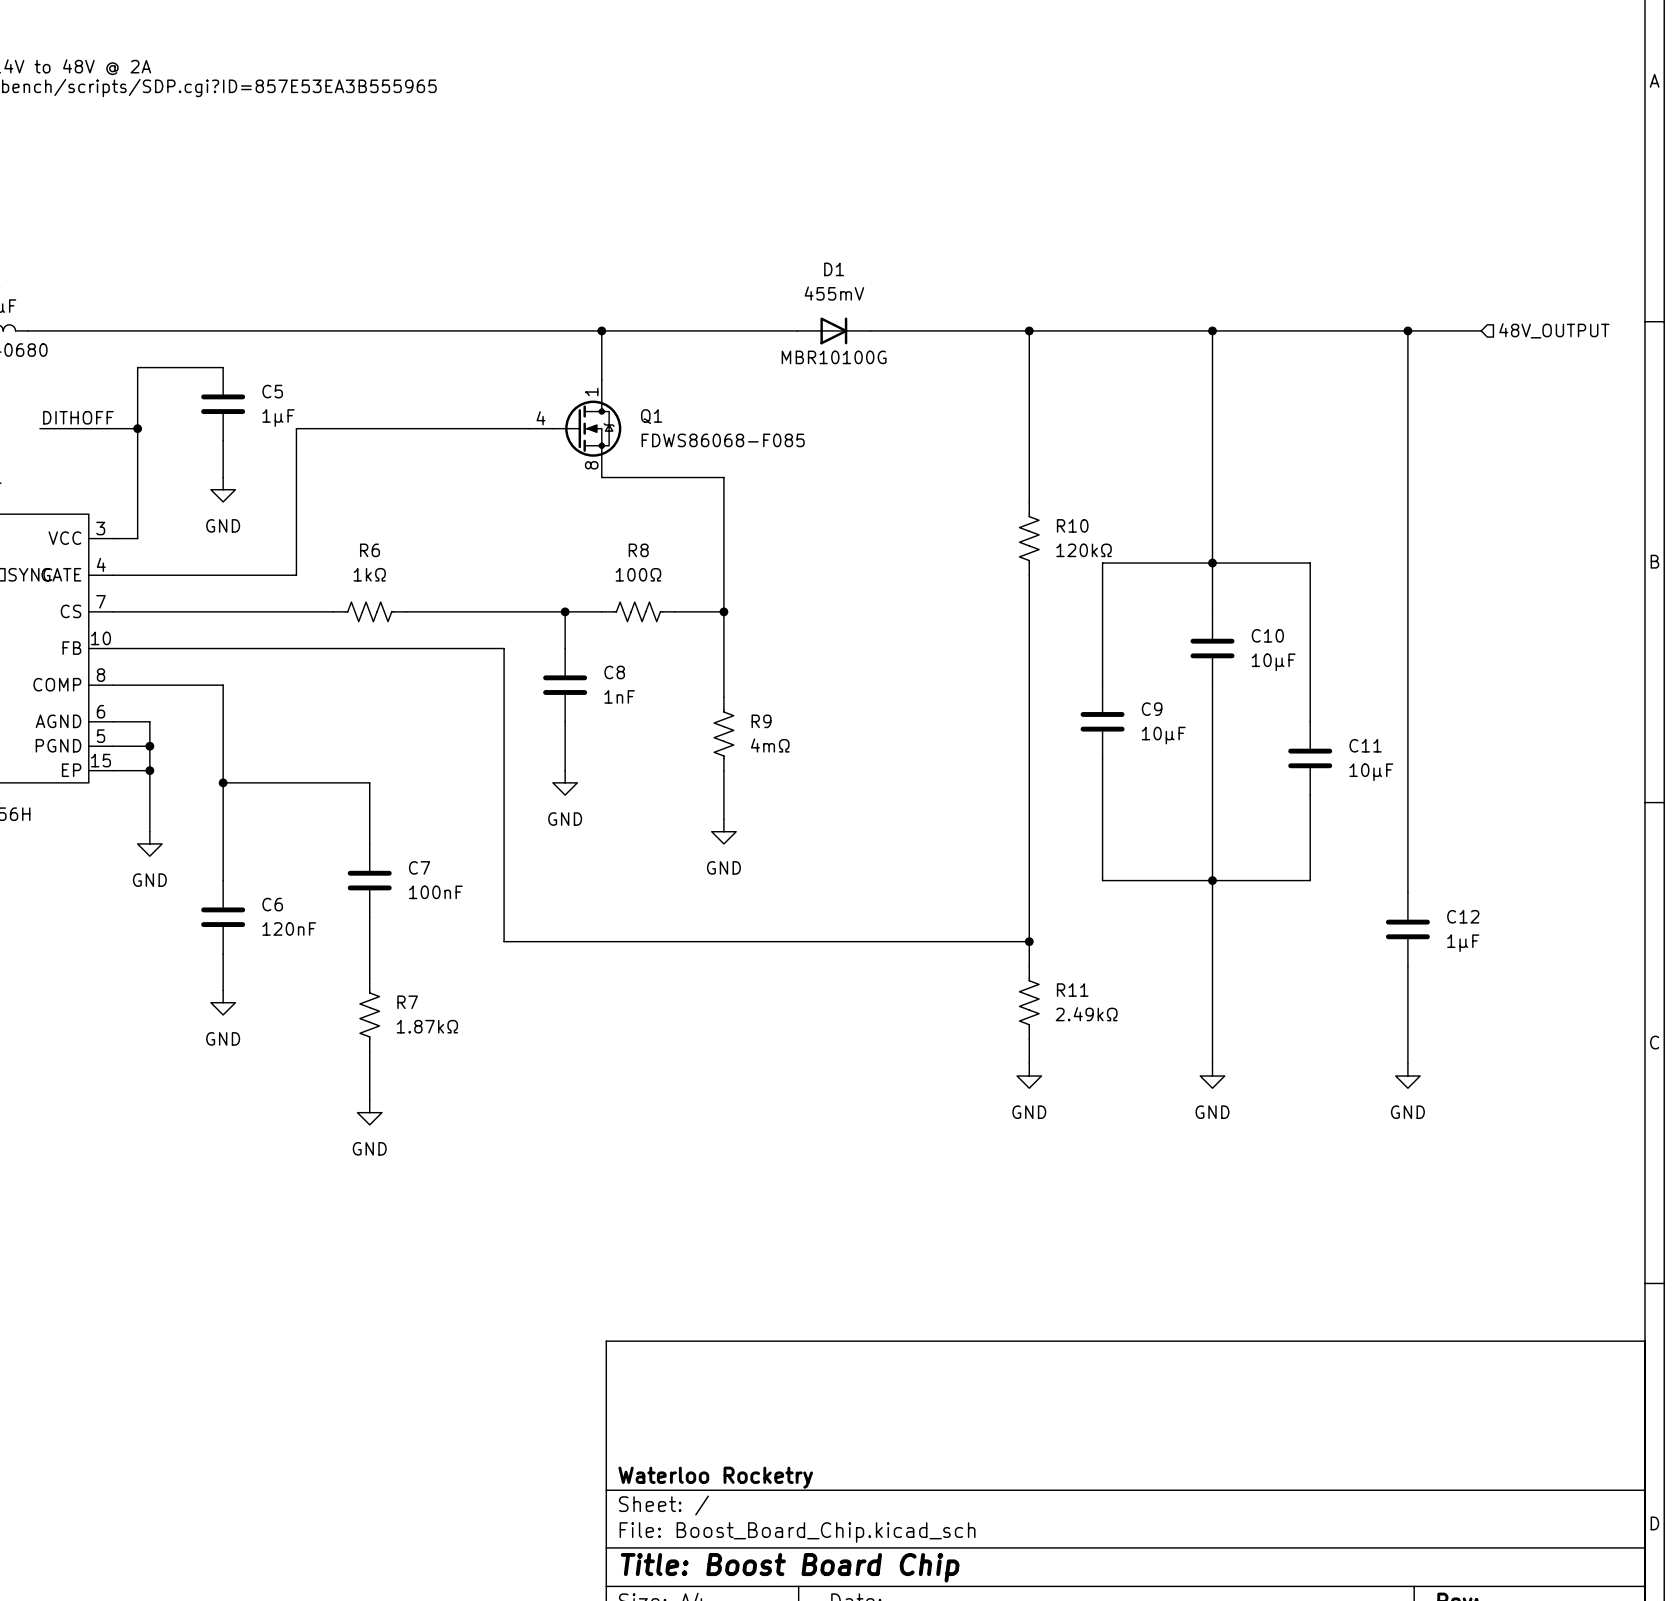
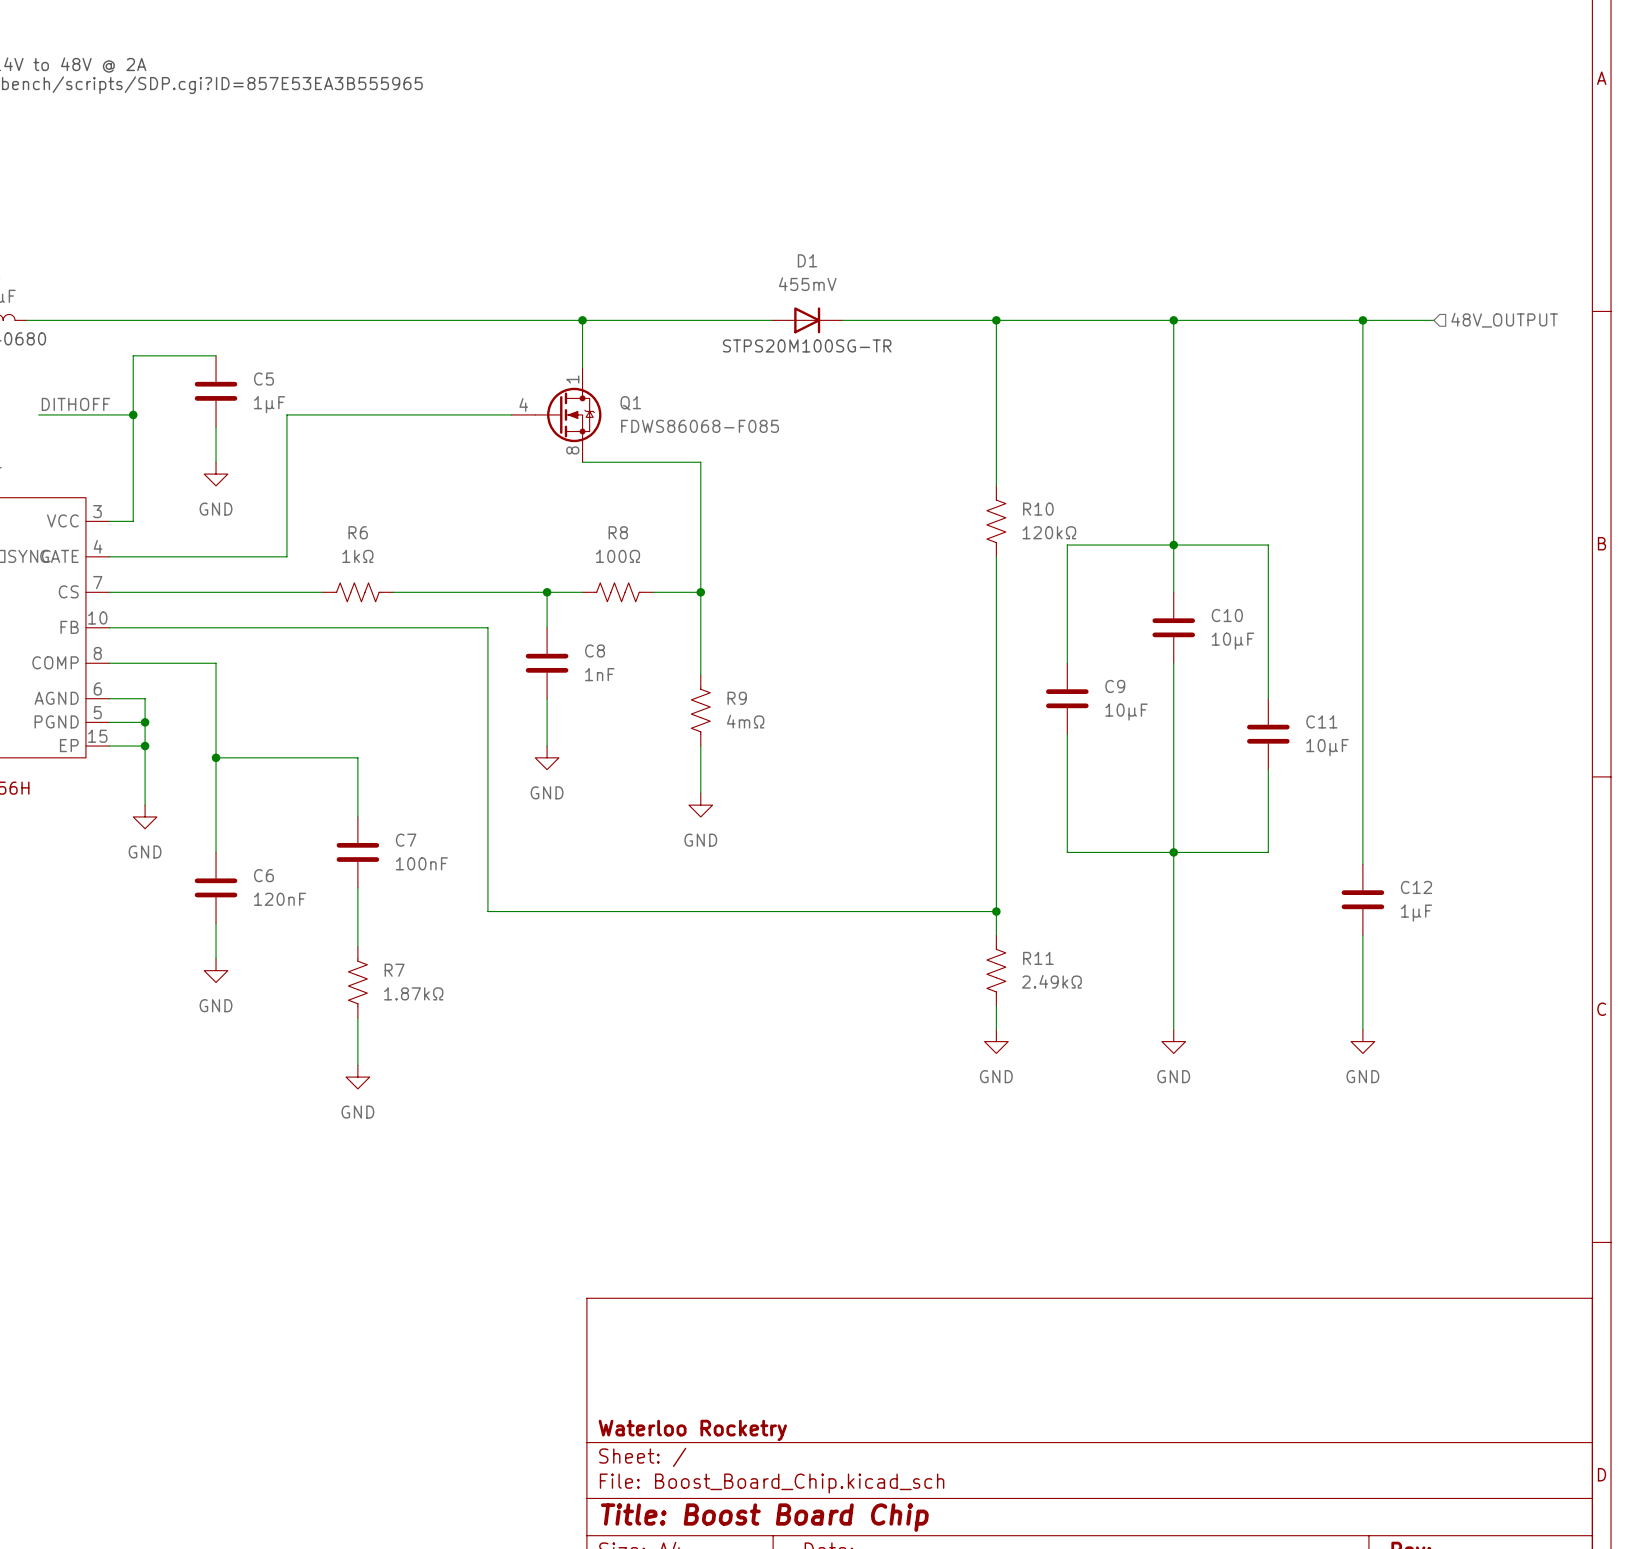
text: MBR10100G (834, 357) -> STPS20M100SG-TR (807, 345)

